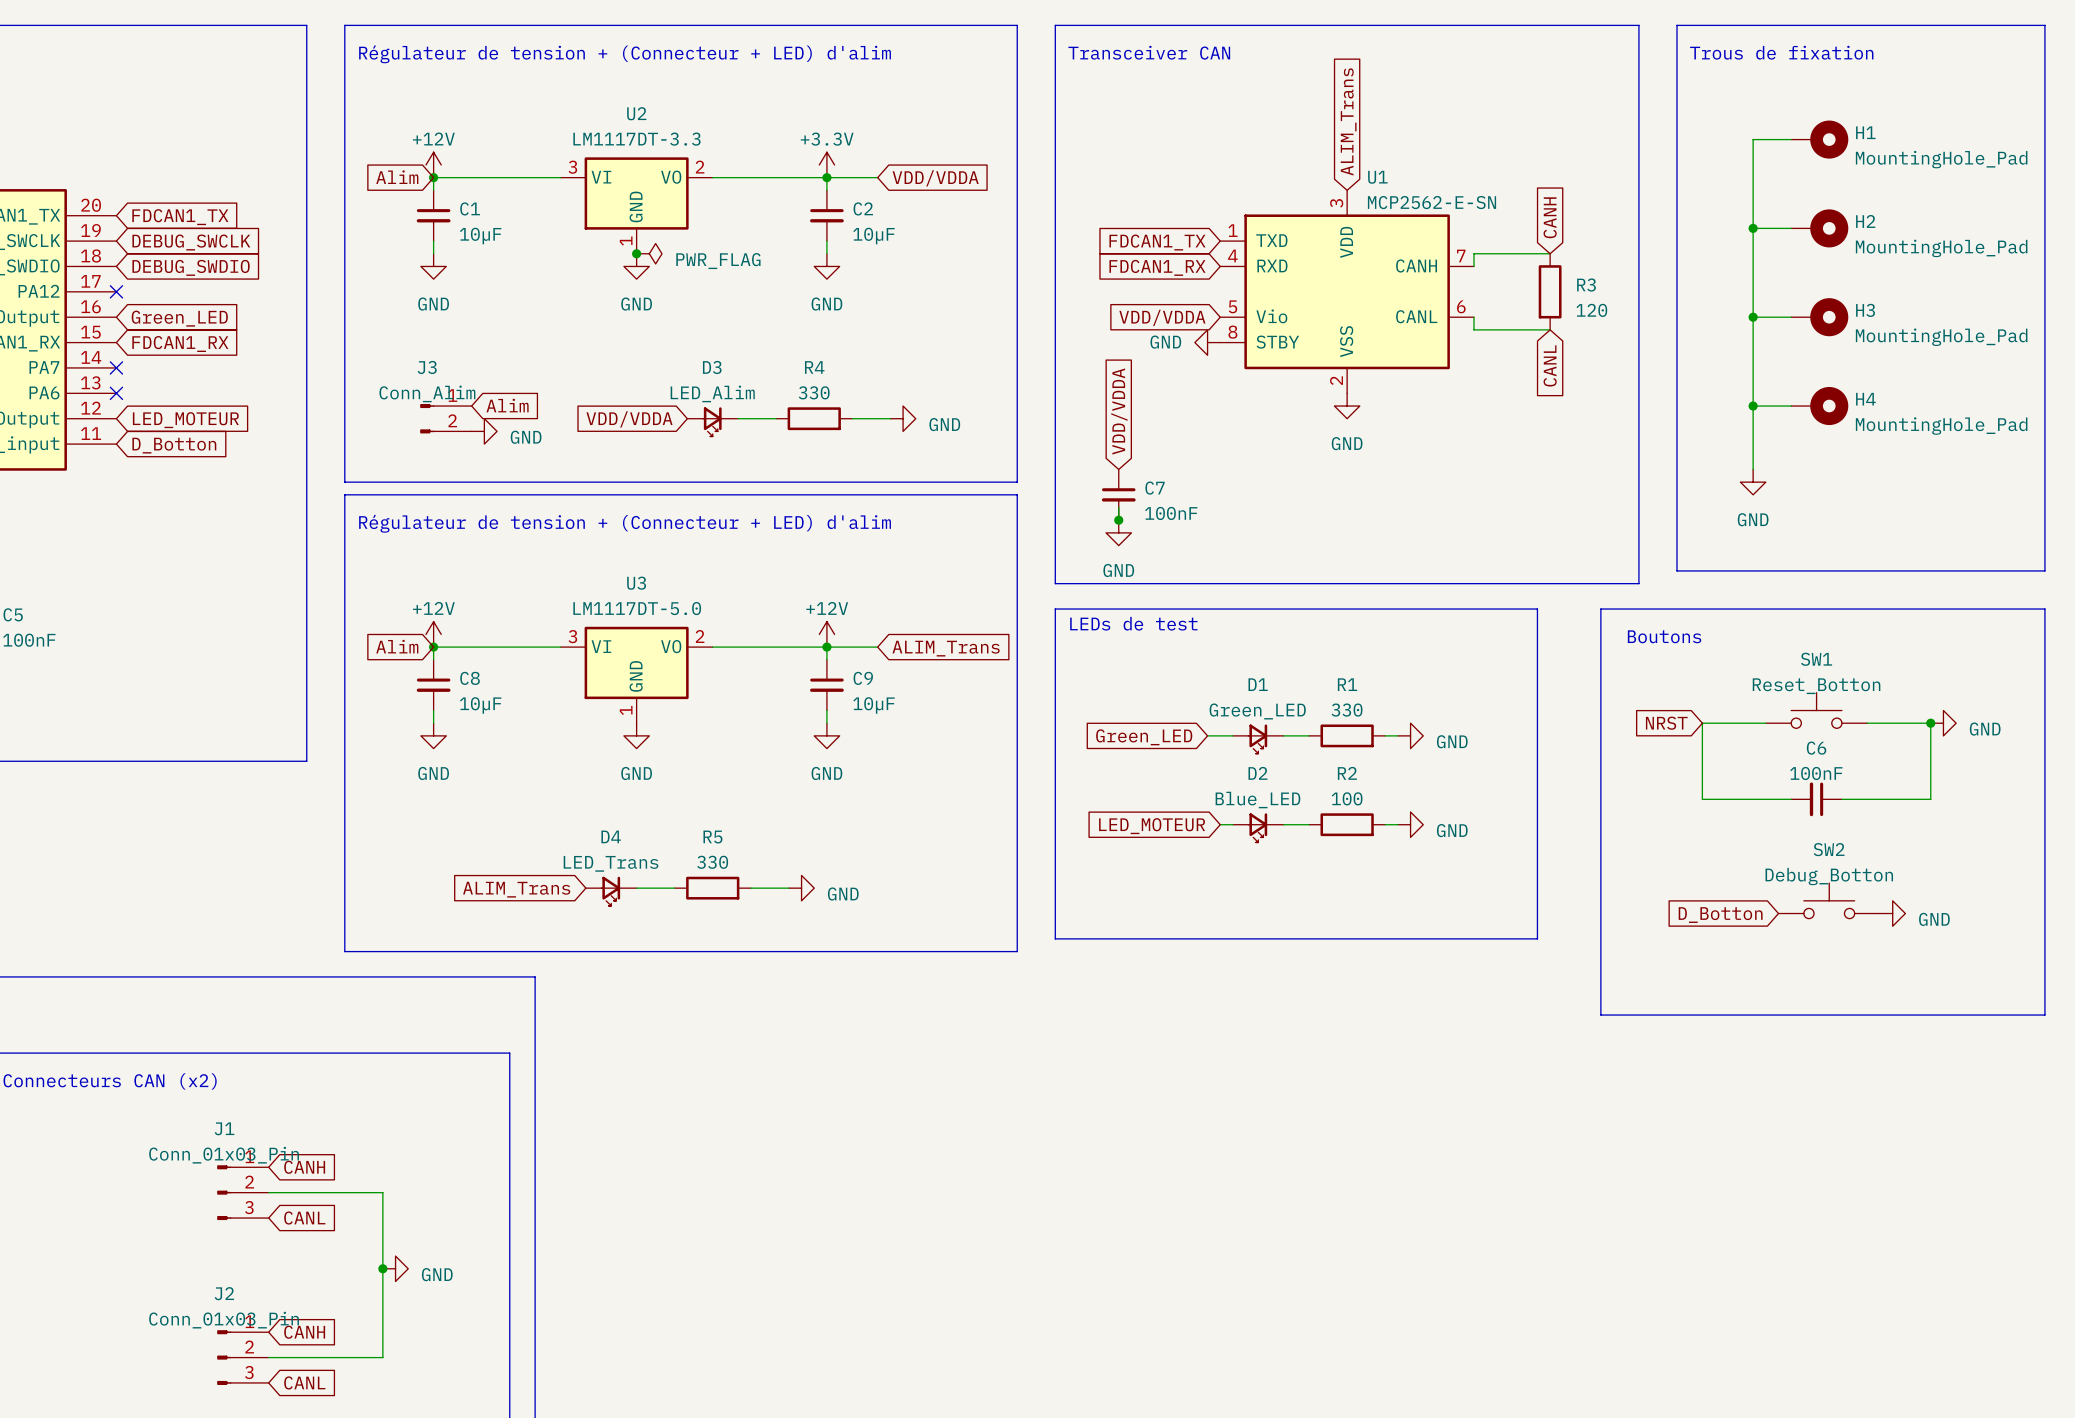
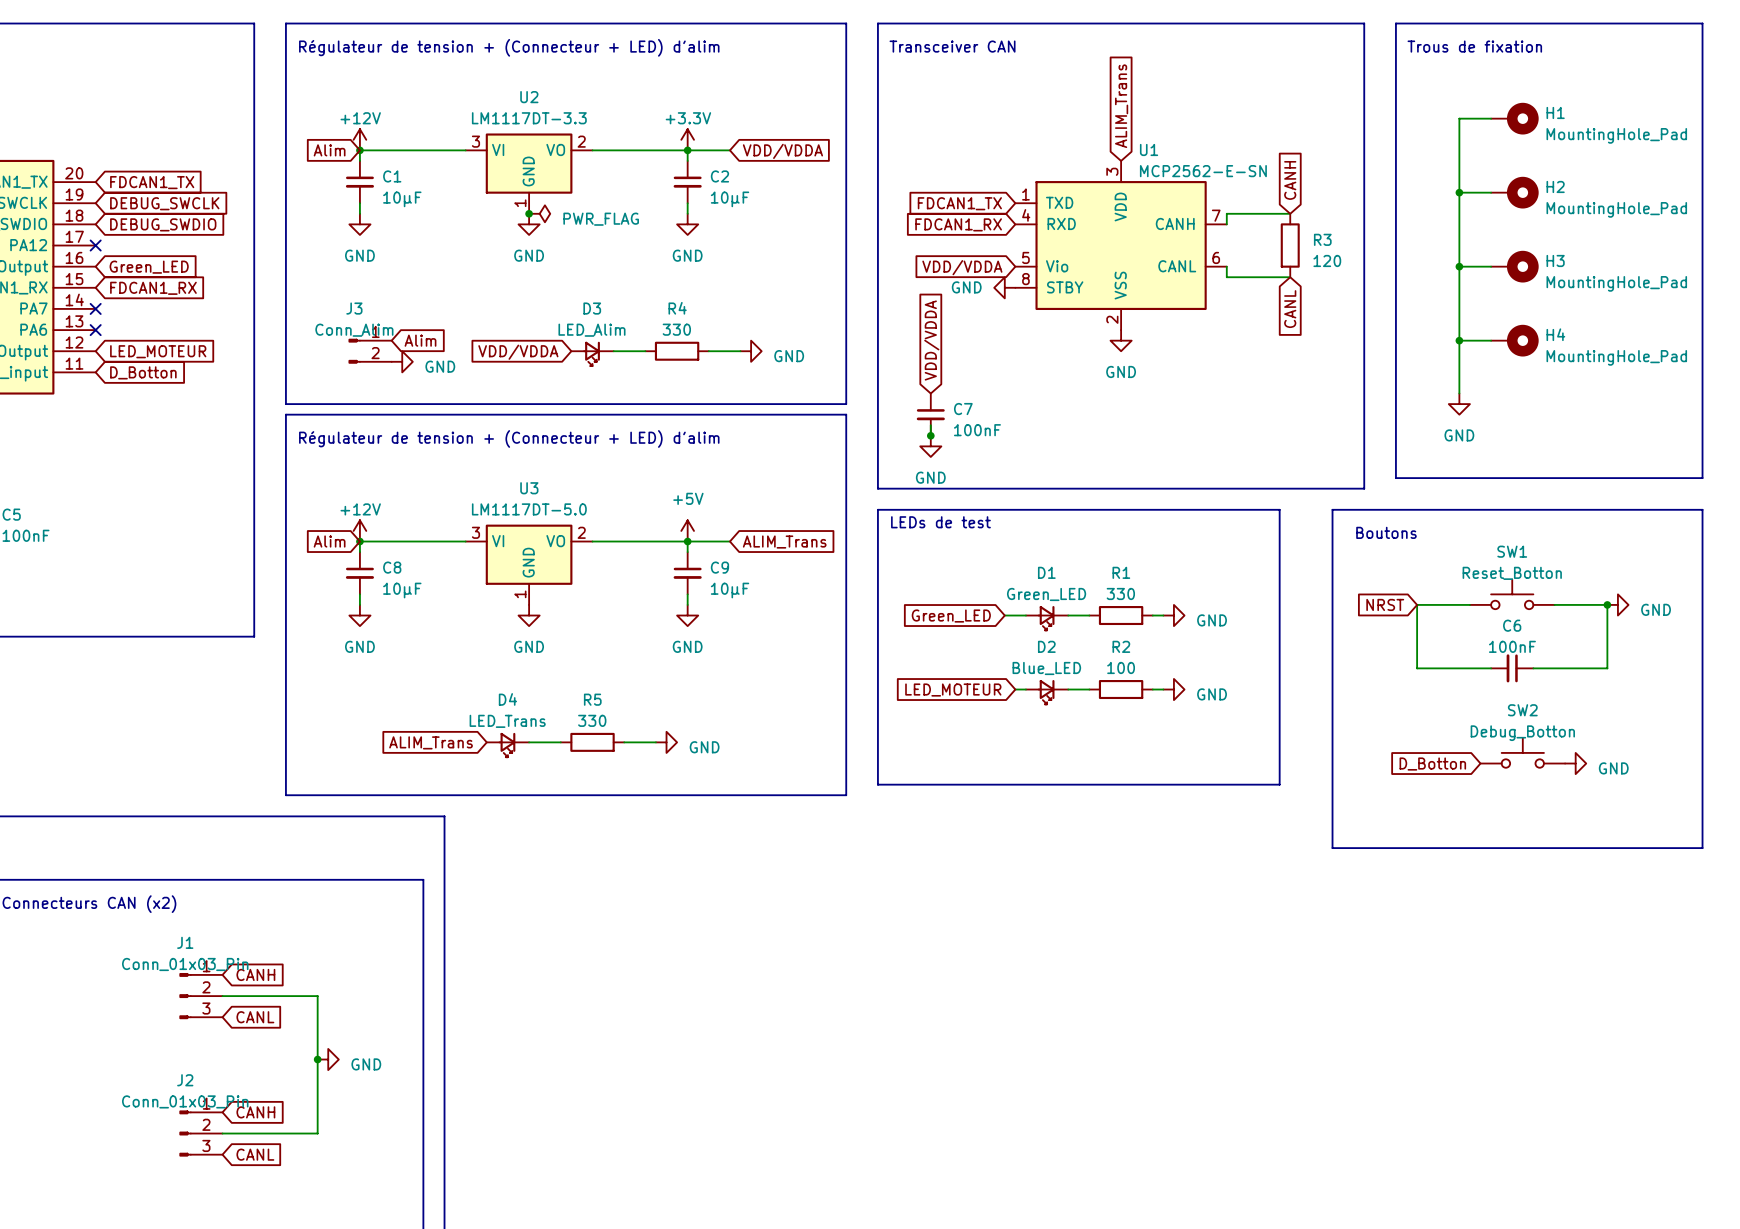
power symbol: +12V (826, 634) -> +5V (687, 530)

